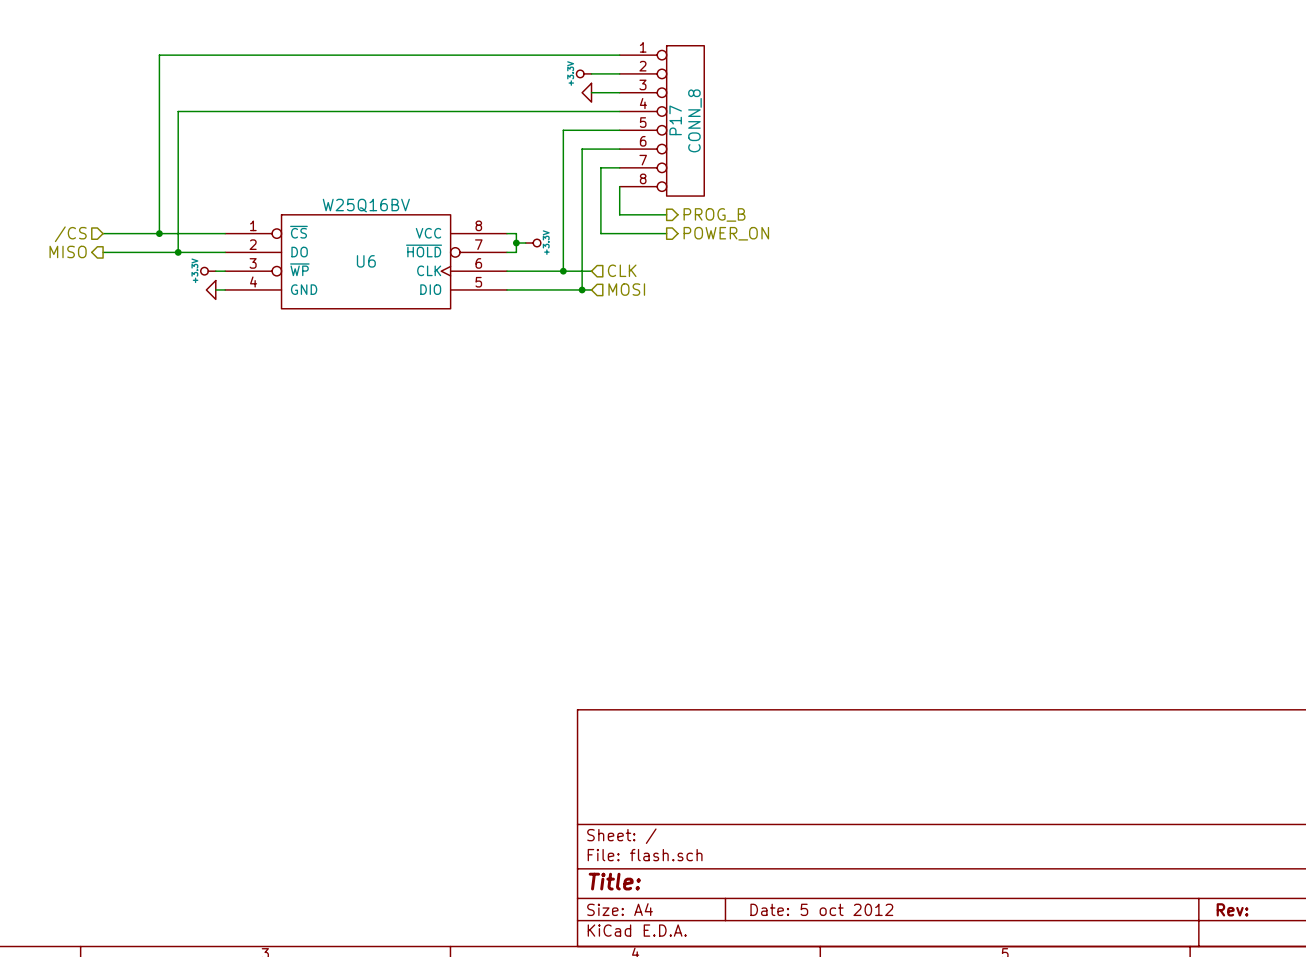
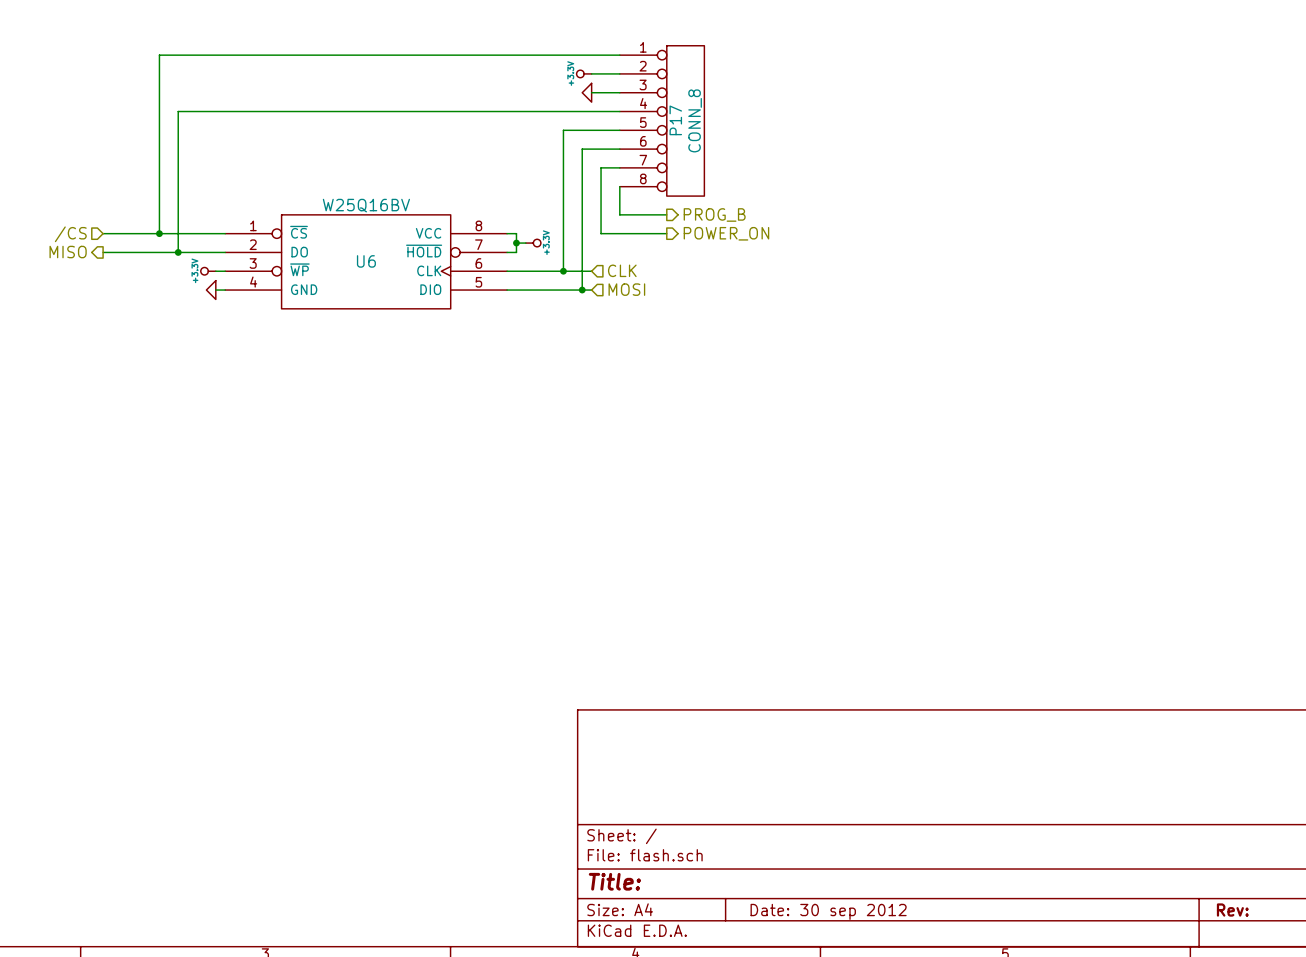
title block: Date: 5 oct 2012 (821, 909) -> Date: 30 sep 2012 (828, 911)

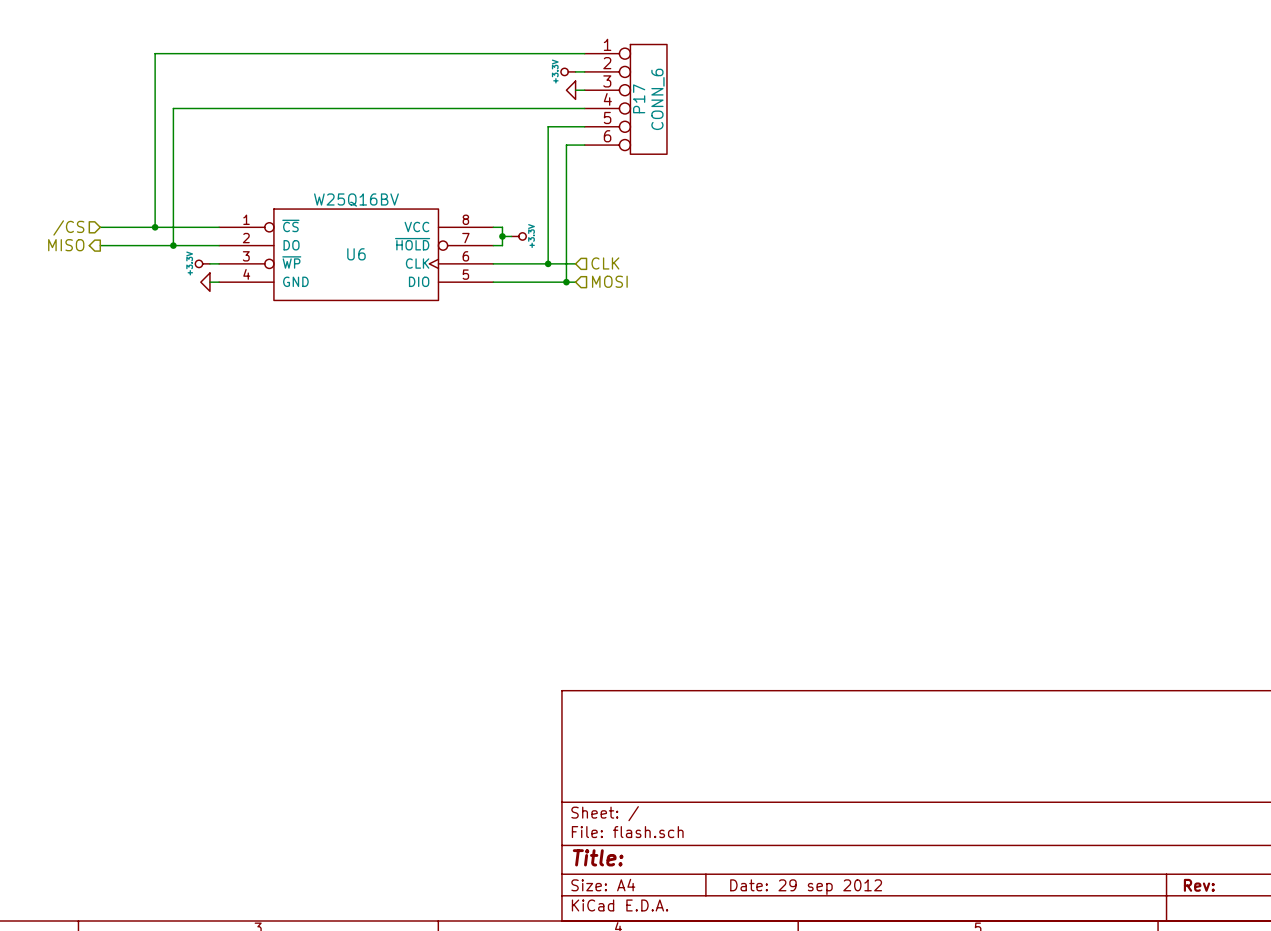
P17 symbol: [619, 45, 705, 197] -> [584, 44, 667, 155]
P17 value: CONN_8 (695, 120) -> CONN_6 (657, 99)
wire: (619, 167) (601, 167) (601, 233) (666, 233) -> none
wire: (619, 186) (619, 214) (666, 214) -> none
hierarchical label: PROG_B (714, 214) -> none
hierarchical label: POWER_ON (726, 233) -> none
title block: Date: 30 sep 2012 (828, 911) -> Date: 29 sep 2012 (806, 887)

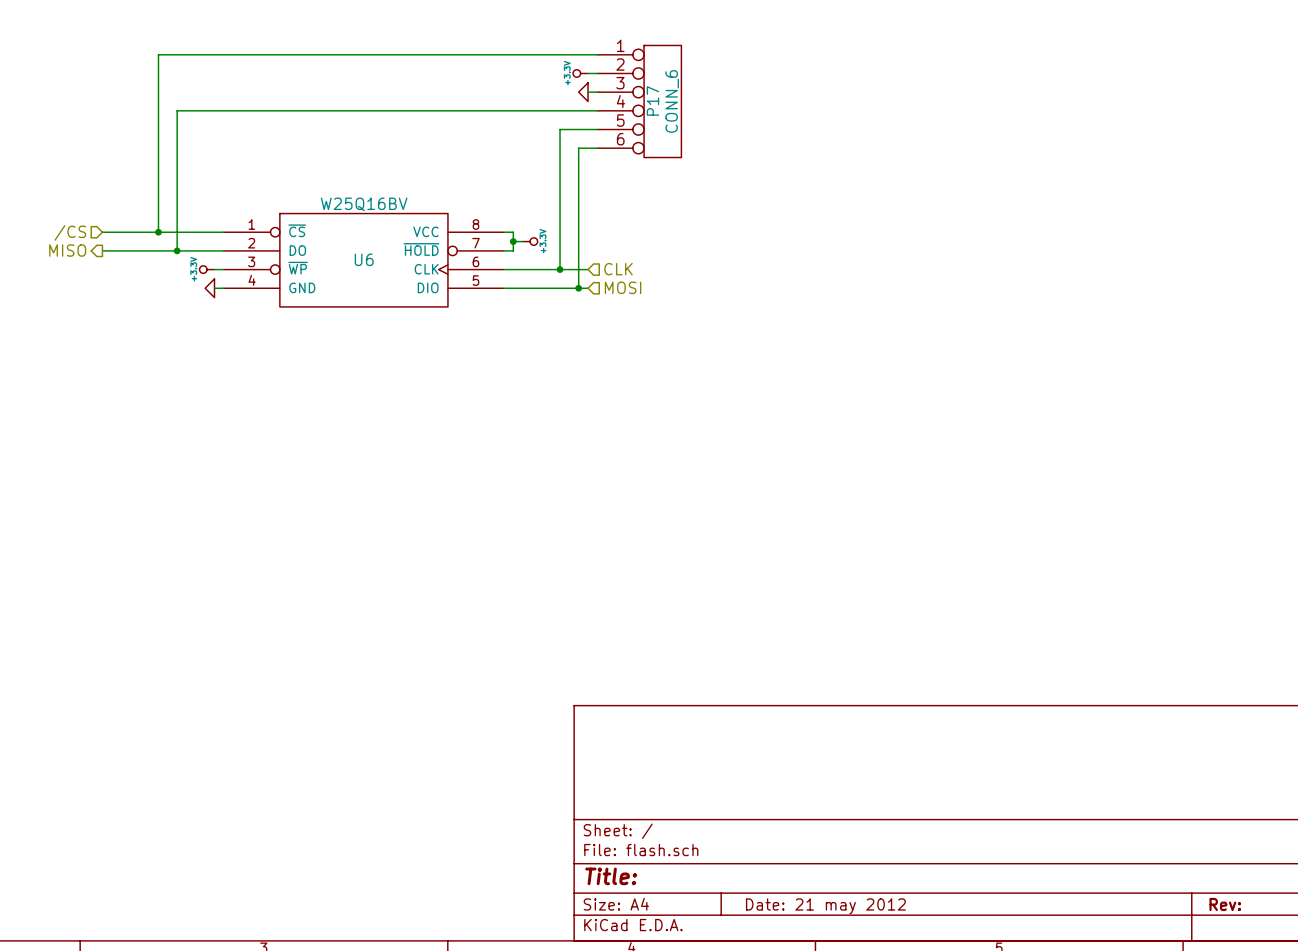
title block: Date: 29 sep 2012 (806, 887) -> Date: 21 may 2012 (825, 906)

